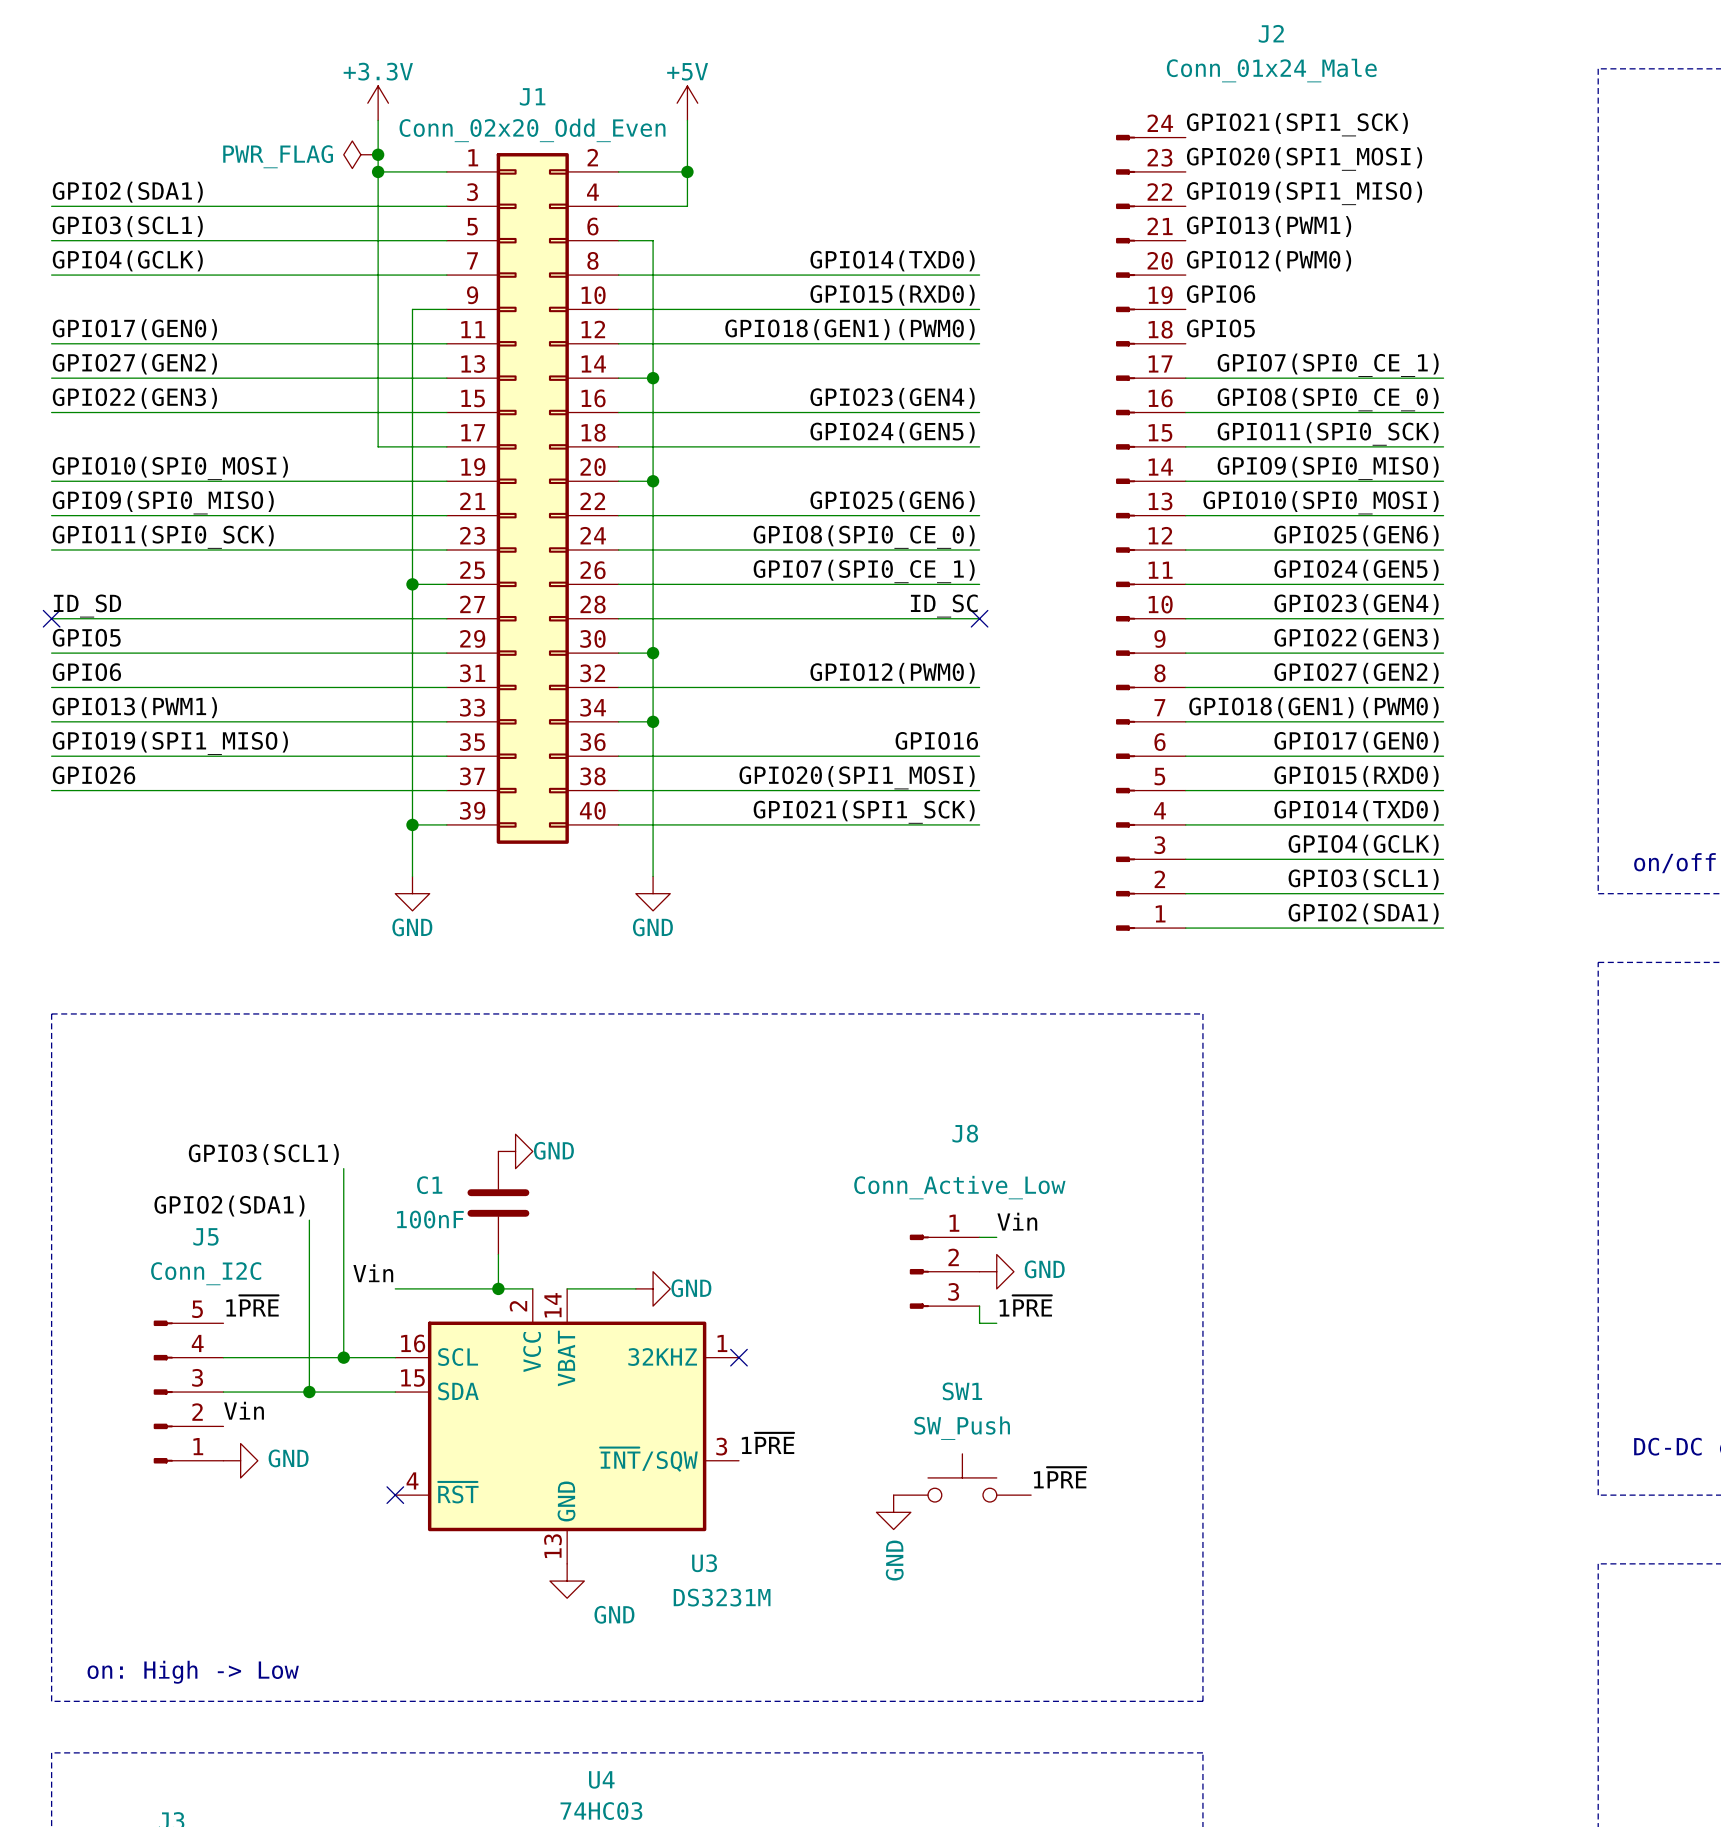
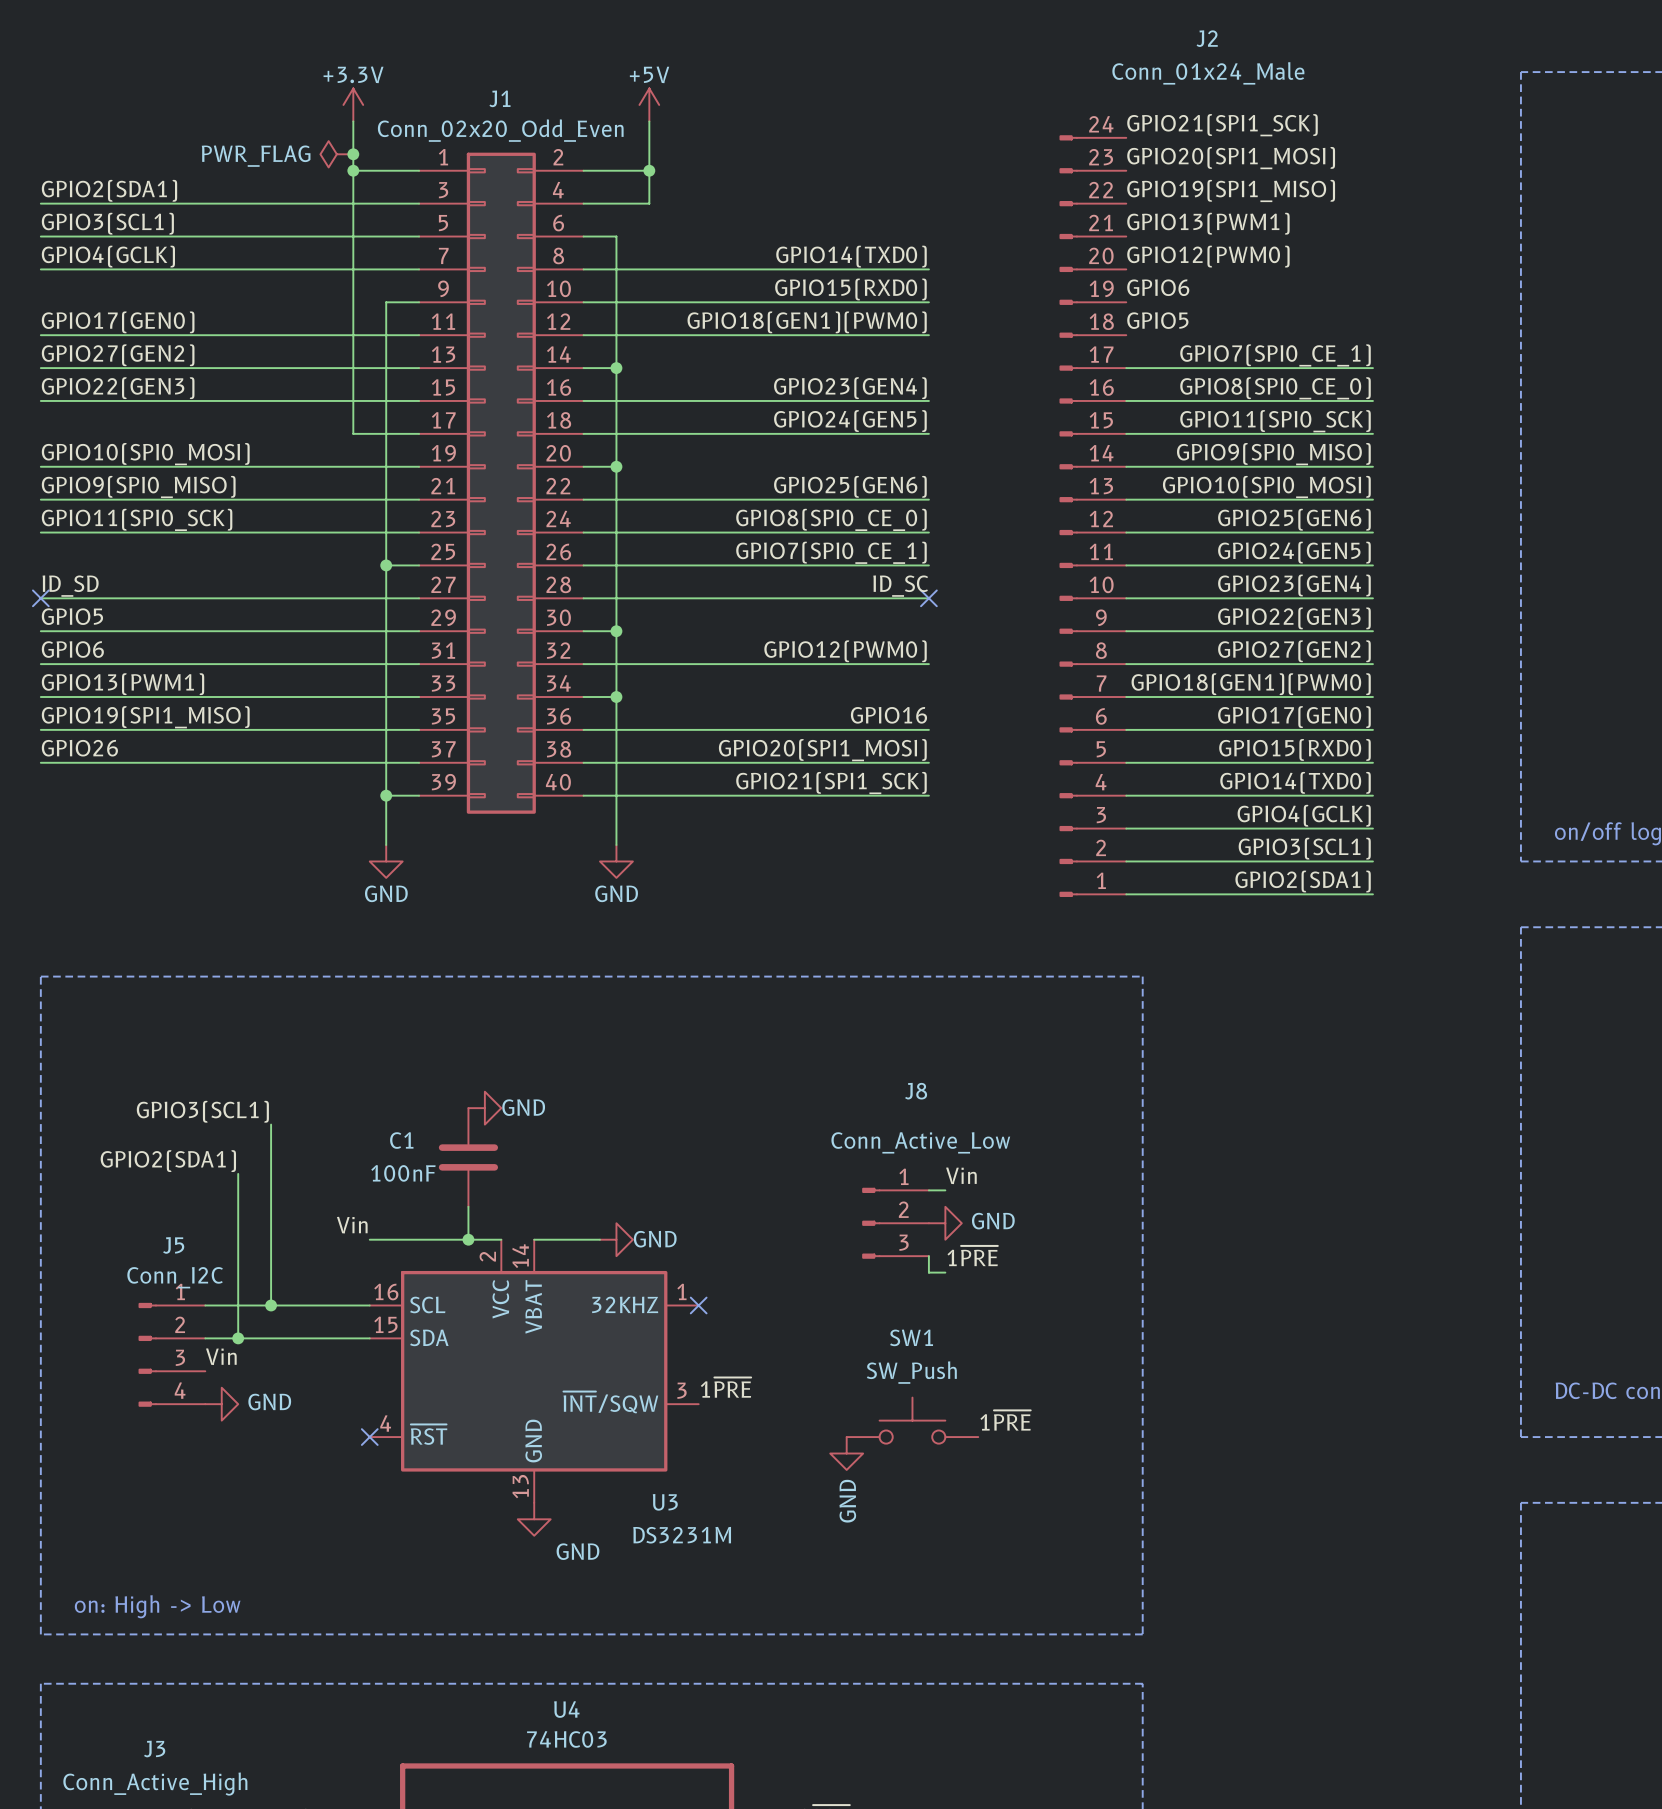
label position: GPIO3(SCL1) (263, 1154) -> GPIO3(SCL1) (202, 1111)
wire: (343, 1168) (343, 1357) -> (271, 1124) (271, 1305)
label position: GPIO2(SDA1) (229, 1206) -> GPIO2(SDA1) (168, 1161)
wire: (309, 1220) (309, 1392) -> (238, 1173) (238, 1338)
J5 name position: J5 (205, 1236) -> J5 (173, 1245)
J5 value position: Conn_I2C (206, 1273) -> Conn_I2C (175, 1277)
label: 1~{PRE} (252, 1305) -> none
J5 symbol: [153, 1320, 224, 1464] -> [138, 1302, 206, 1407]
junction: none -> (271, 1305)
junction: (343, 1357) -> none
junction: none -> (238, 1338)
junction: (309, 1392) -> none

